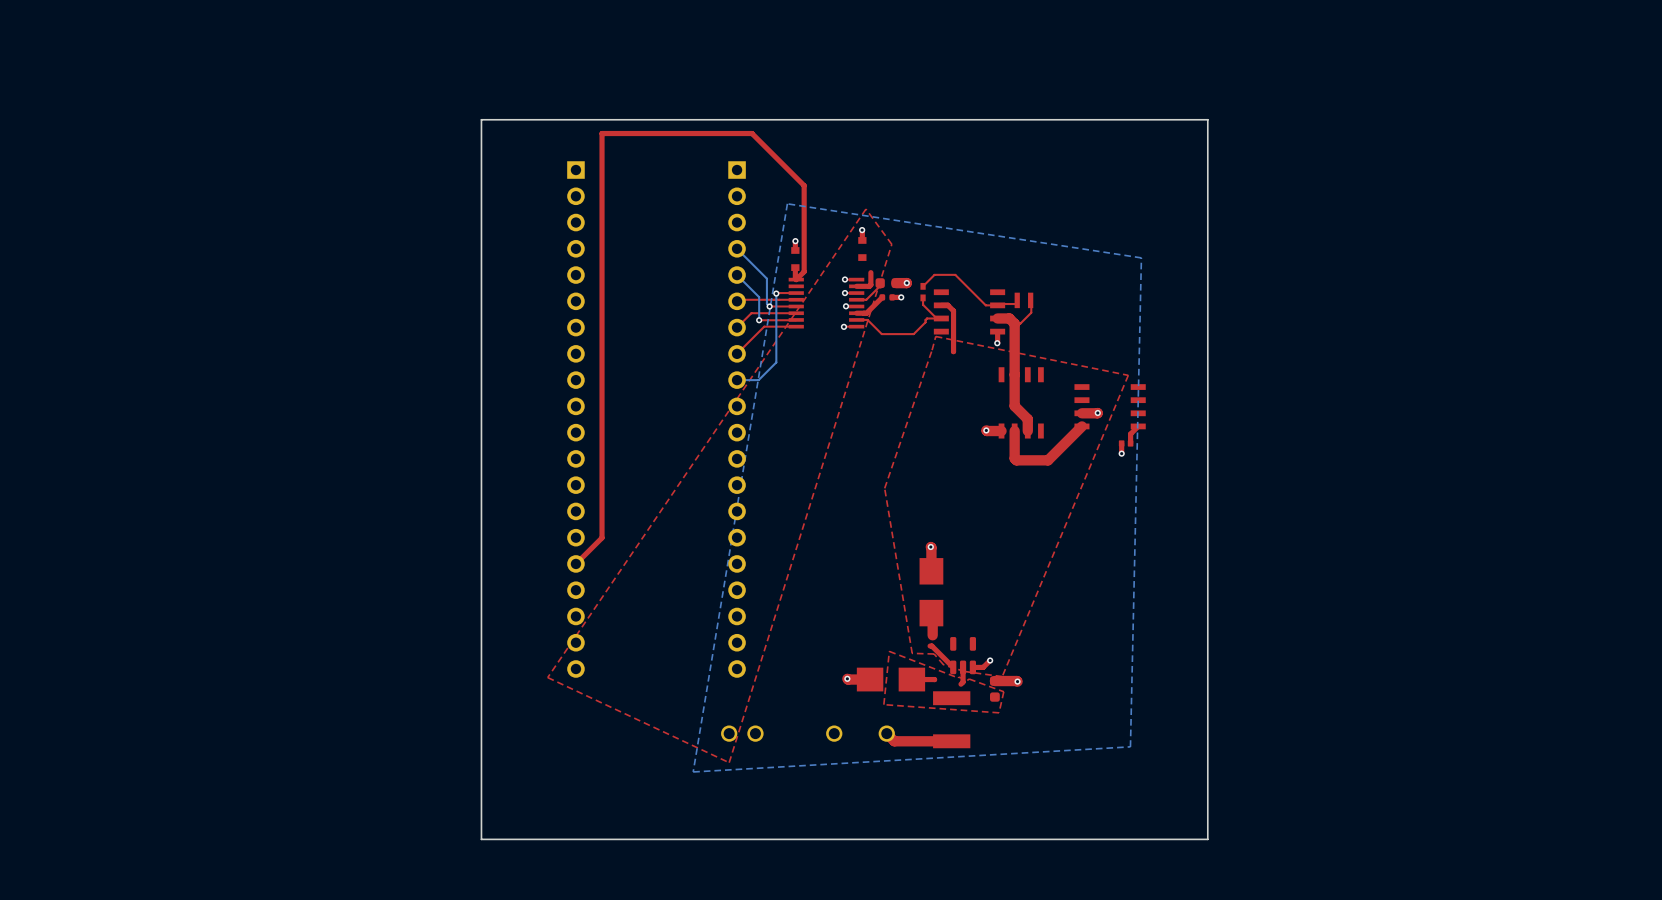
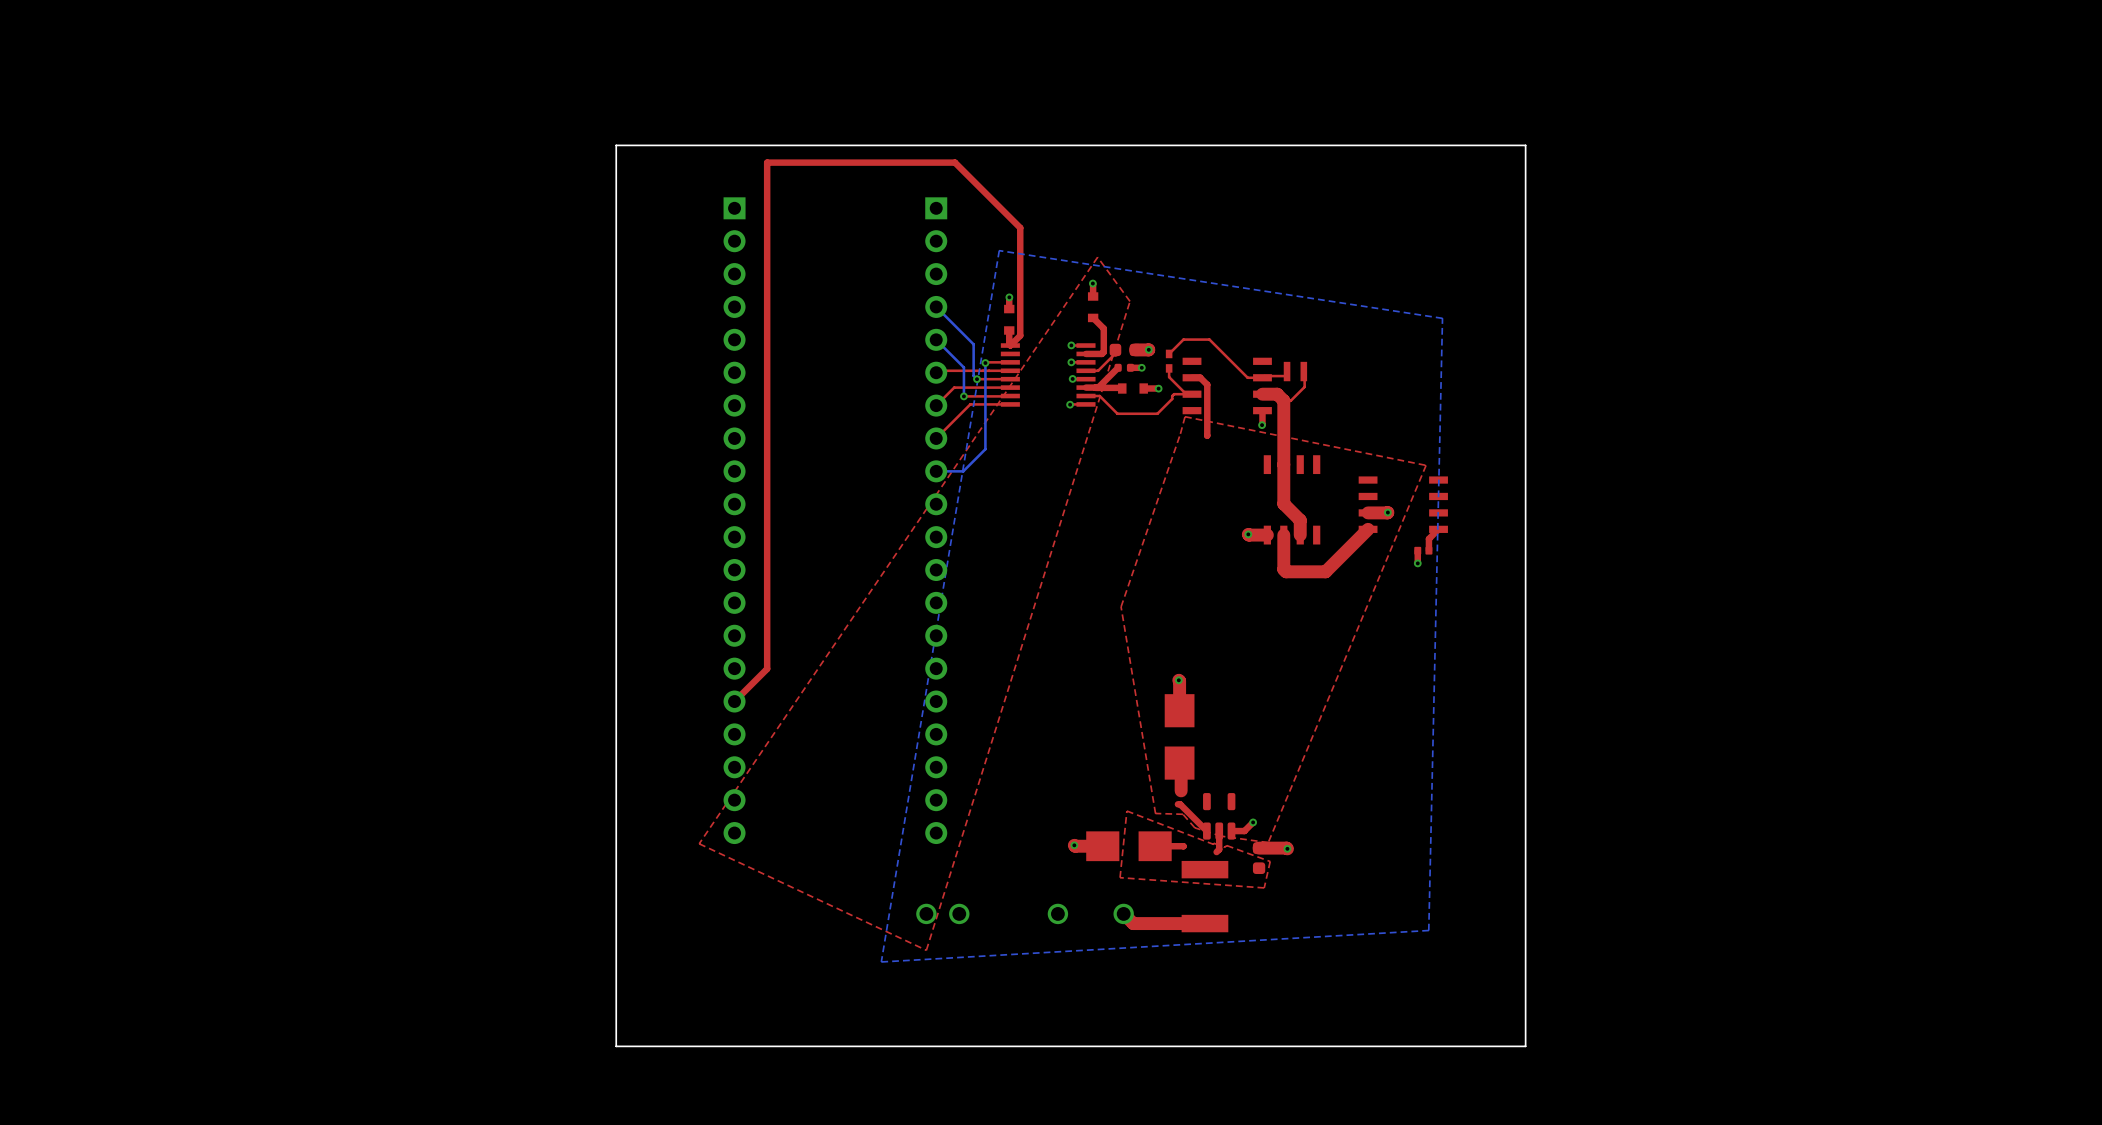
top track: none -> (1093, 317) (1103, 328) (1103, 336)
top track: none -> (1098, 387) (1122, 388)
part: none -> (1132, 388)
top track: none -> (1158, 388) (1143, 388)
via: none -> (1158, 388)

